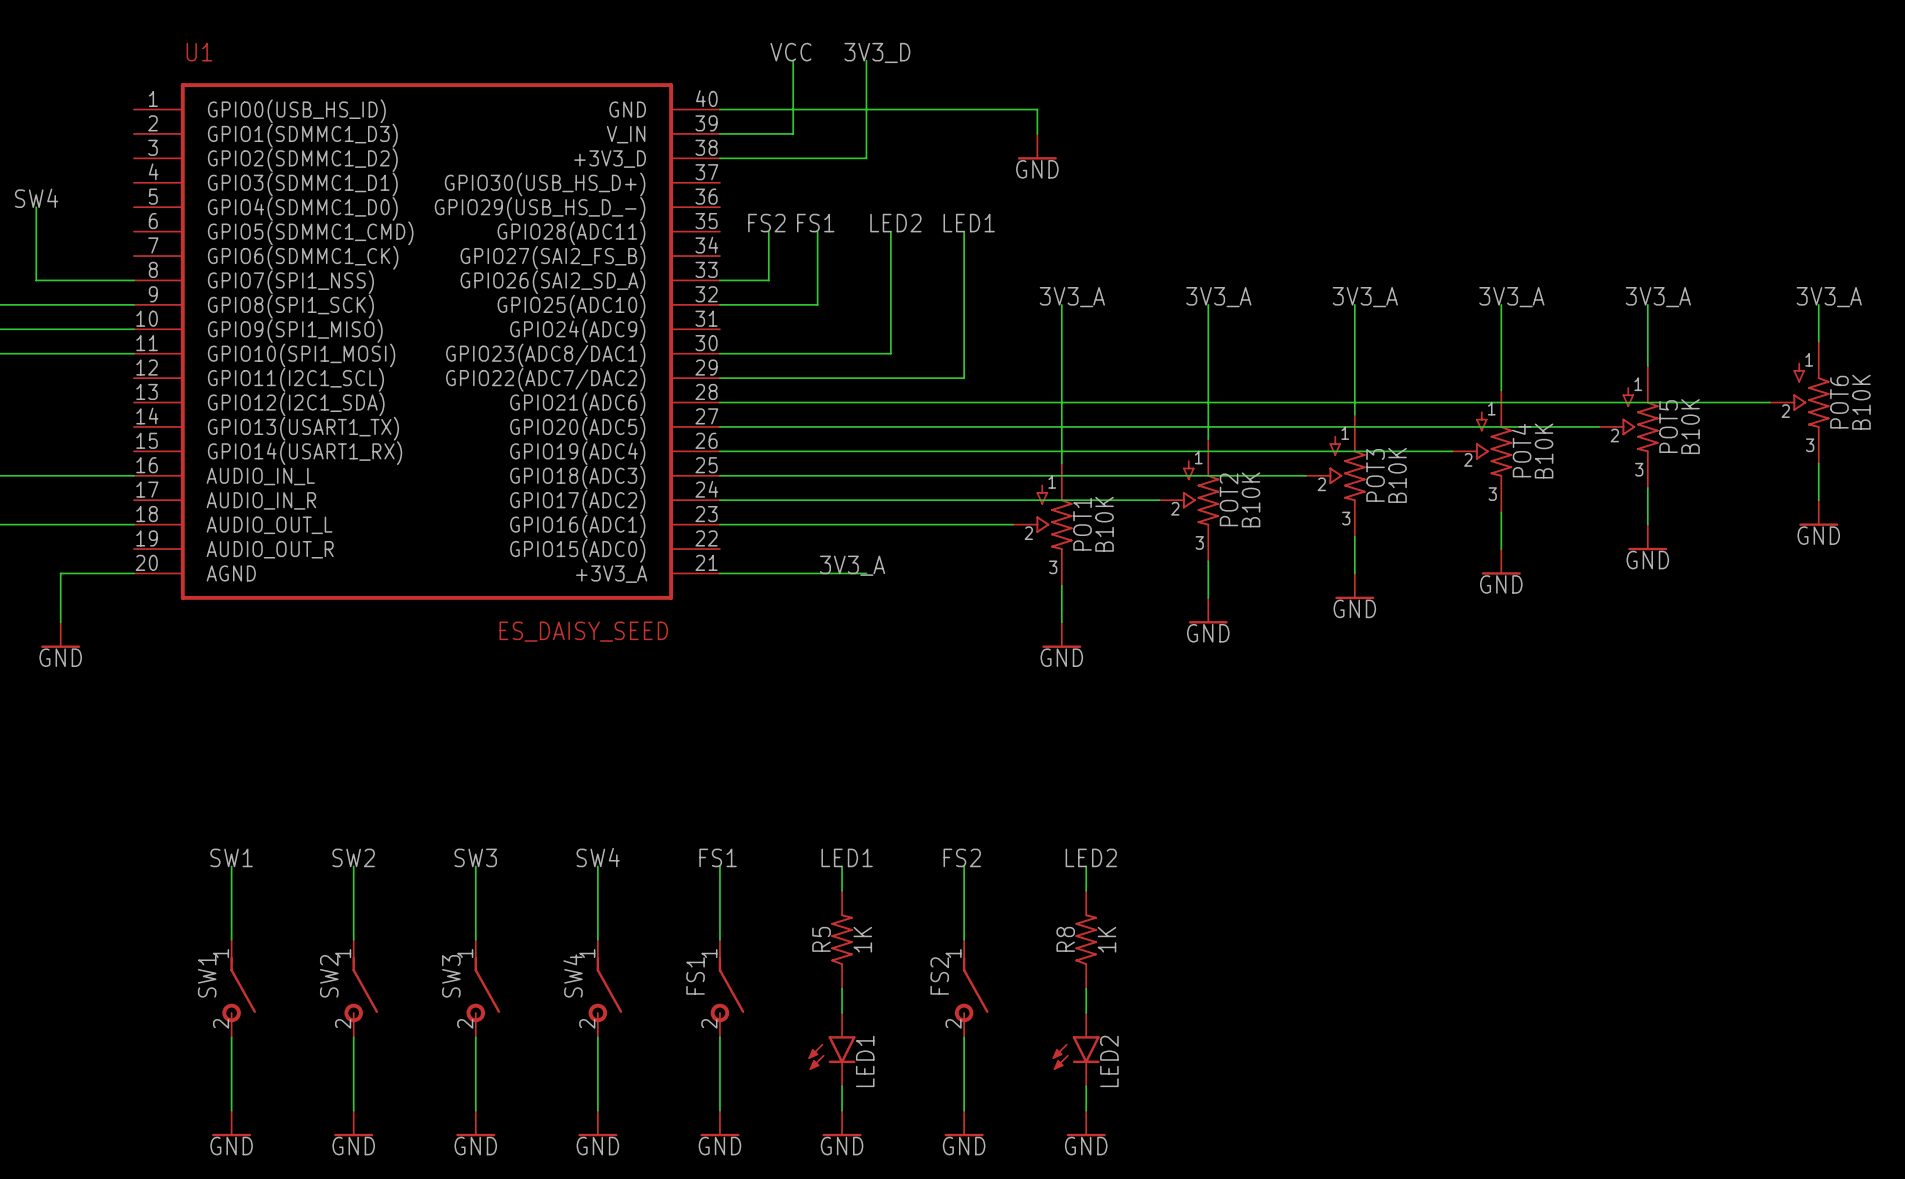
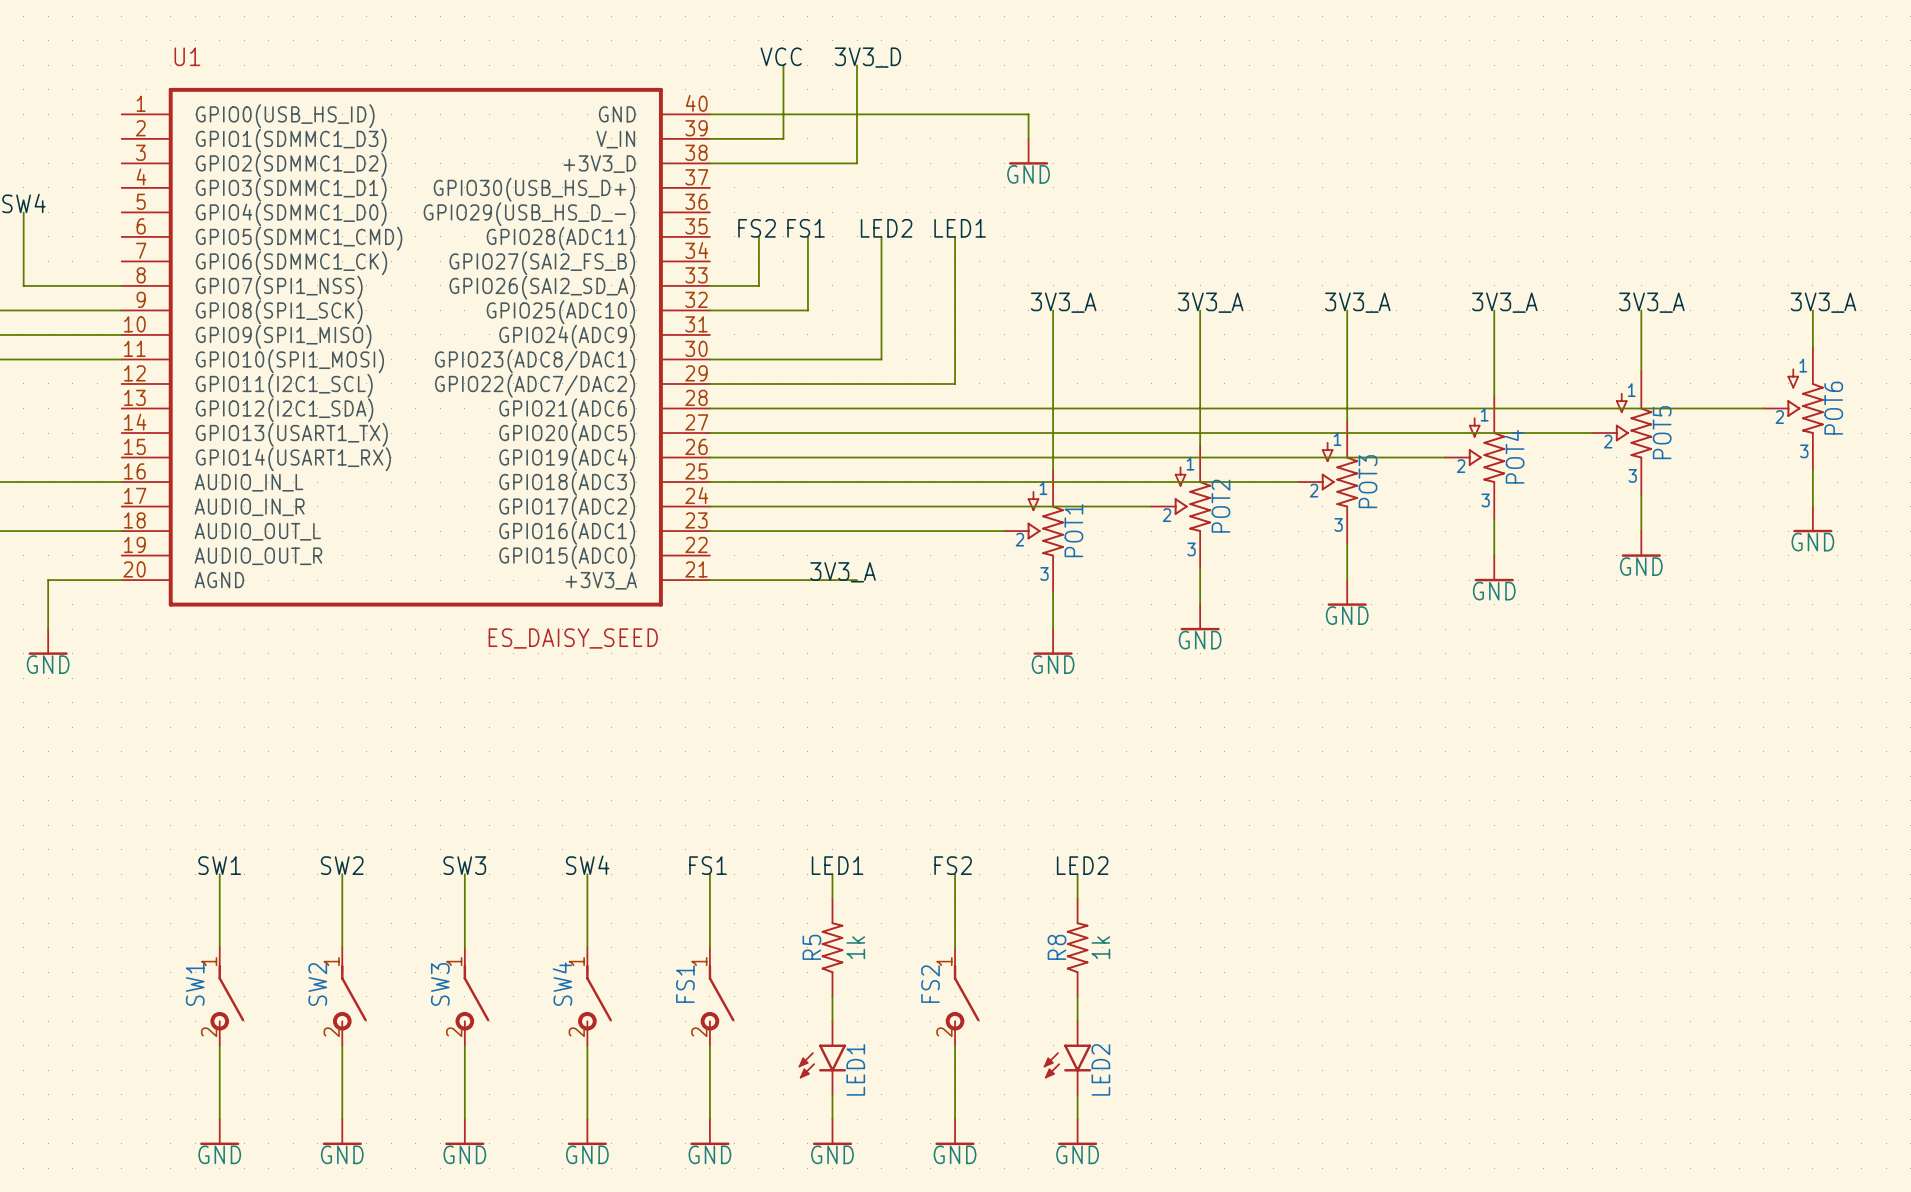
POT6 value: B10K (1861, 402) -> none
POT5 value: B10K (1690, 426) -> none
POT4 value: B10K (1544, 451) -> none
POT3 value: B10K (1397, 475) -> none
POT2 value: B10K (1251, 499) -> none
POT1 value: B10K (1104, 524) -> none
R5 value: 1K (862, 939) -> 1k (855, 947)
R8 value: 1K (1106, 939) -> 1k (1100, 947)

